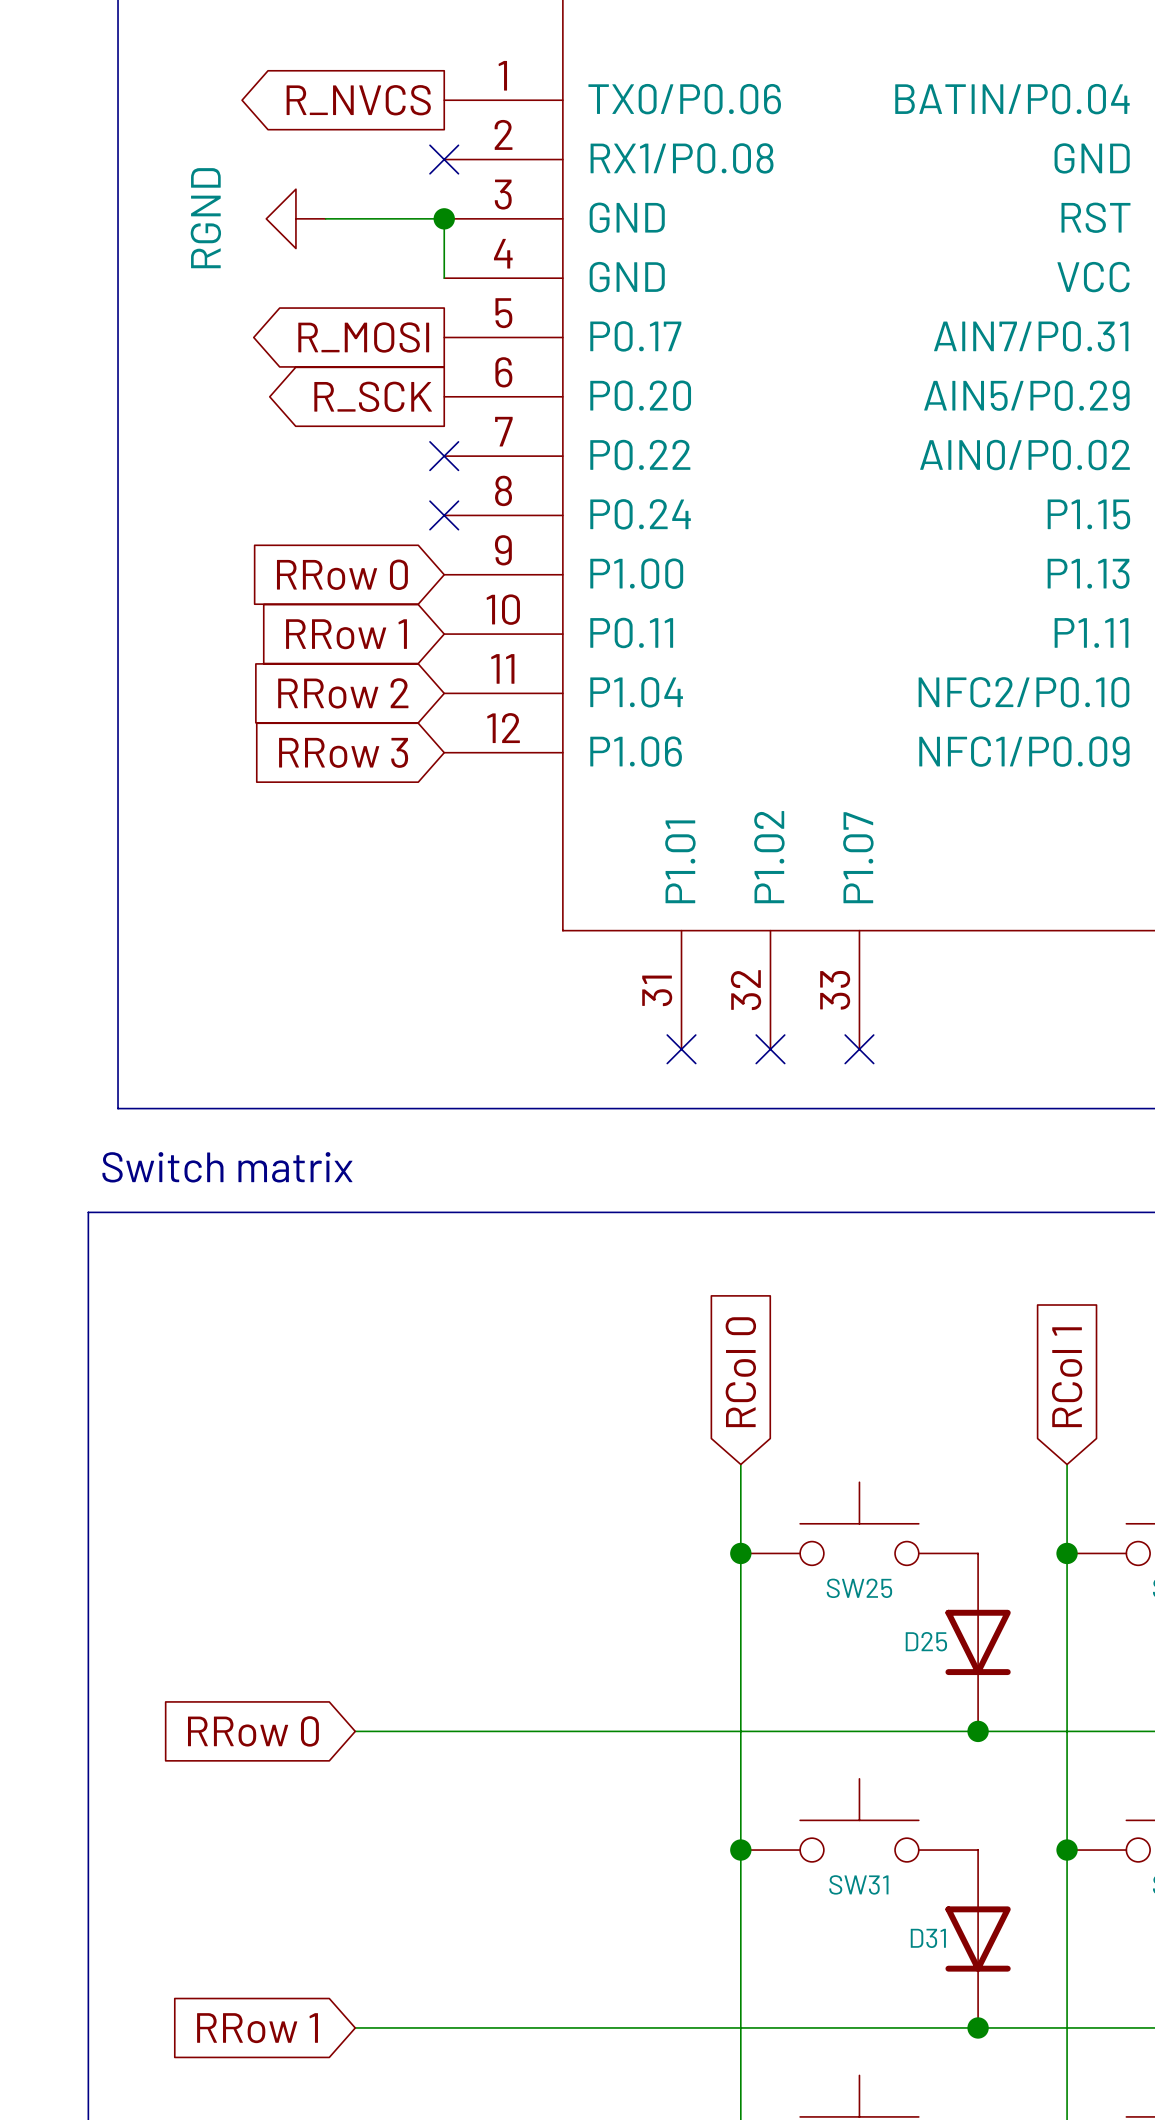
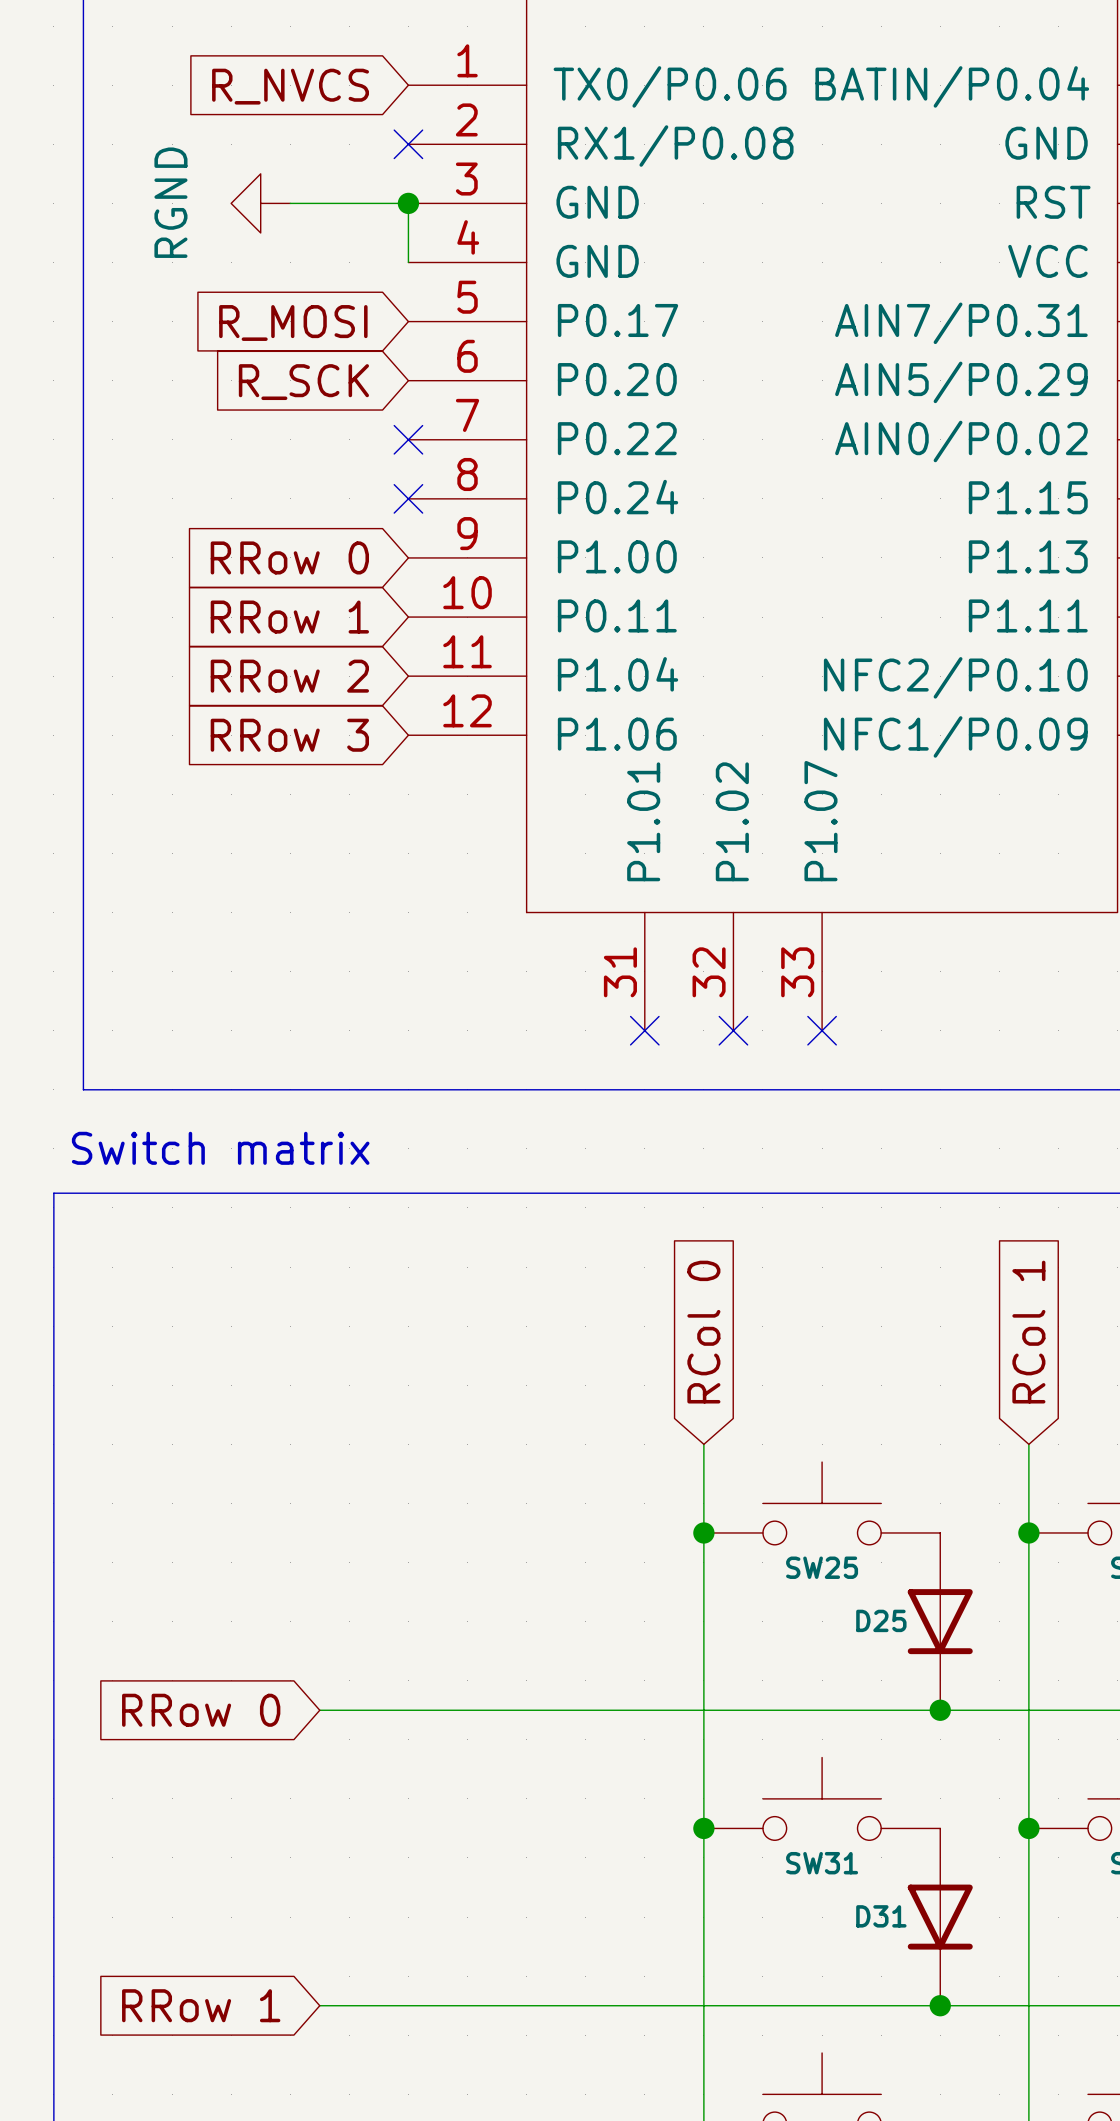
global label shape: output (358, 100) -> input (290, 86)
global label shape: output (363, 337) -> input (293, 322)
global label shape: output (373, 396) -> input (303, 382)

